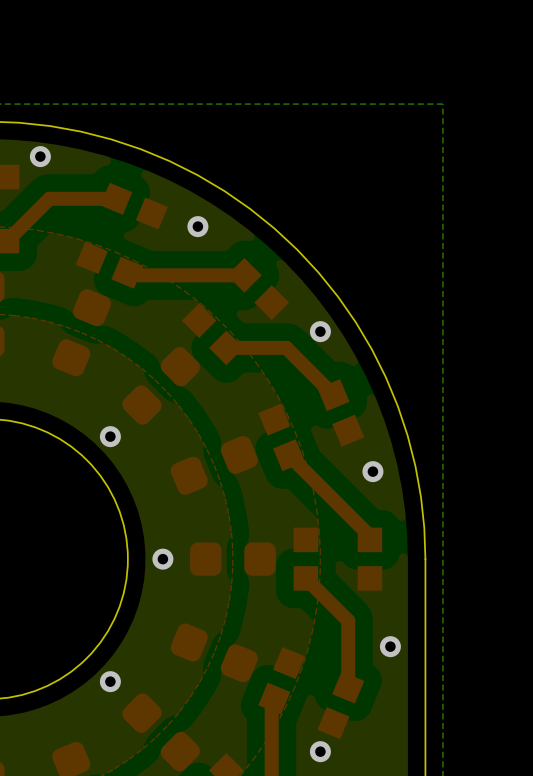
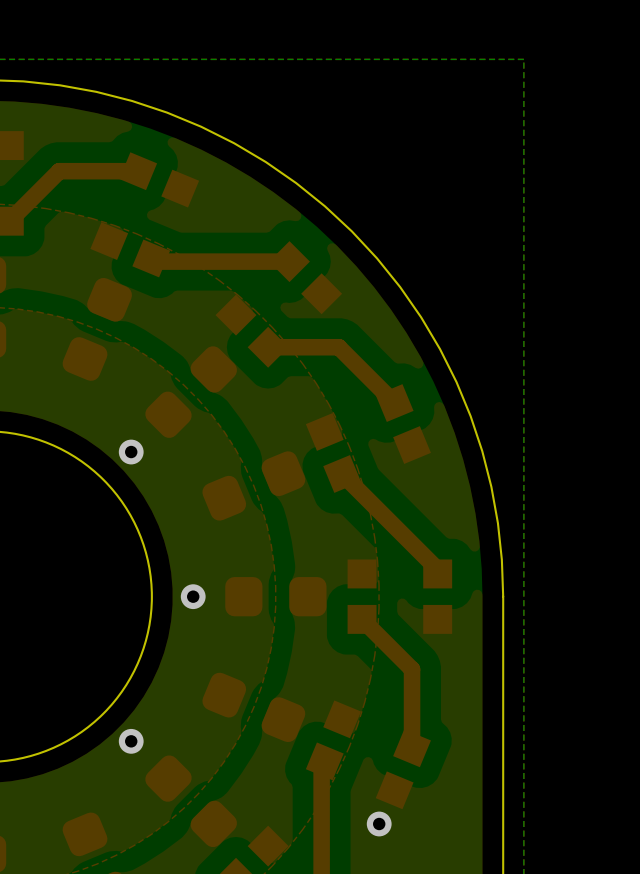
via: (40, 156) -> none
via: (197, 226) -> none
via: (320, 331) -> none
via: (372, 471) -> none
via: (390, 646) -> none

